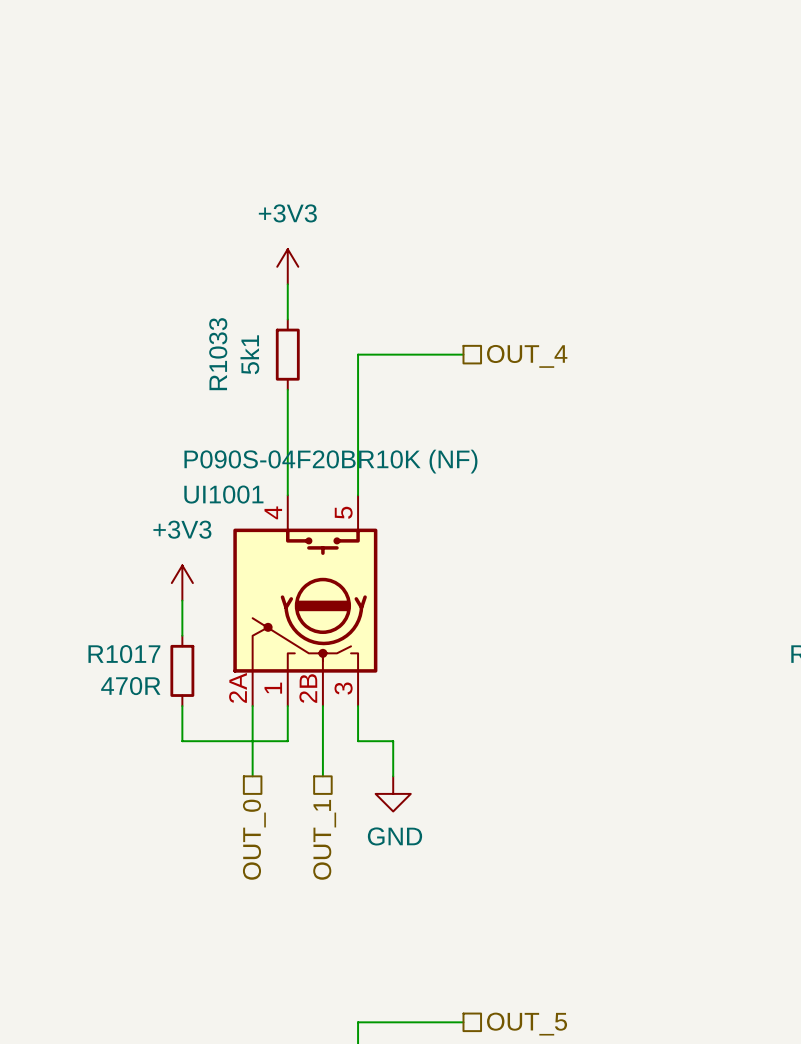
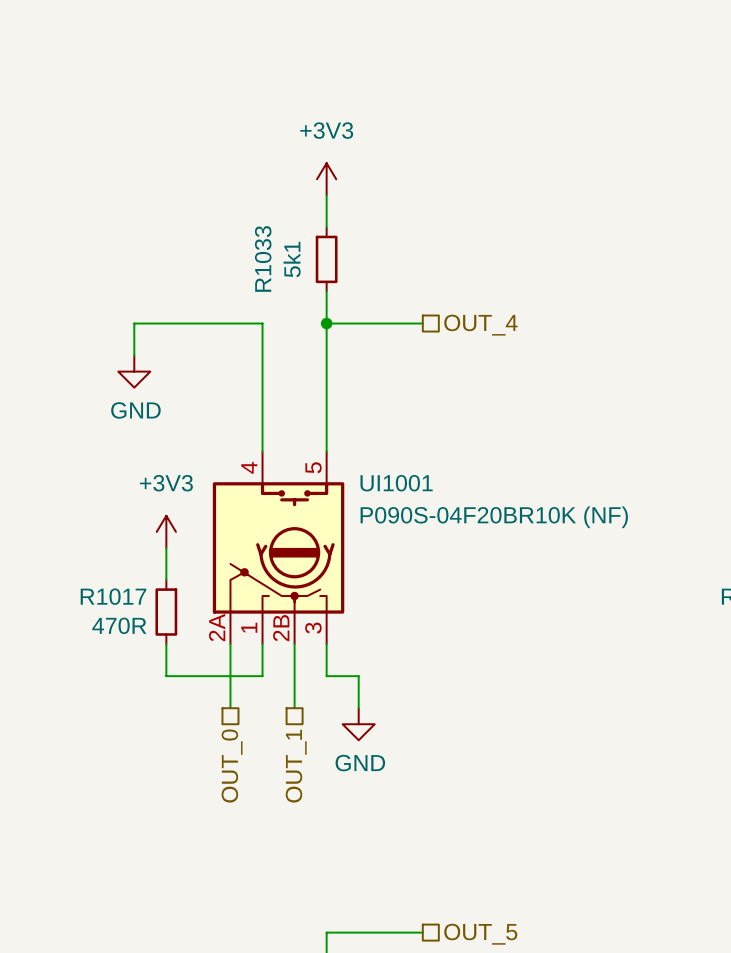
wire: none -> (326, 195) (326, 227)
power symbol position: +3V3 (287, 266) -> +3V3 (326, 179)
wire: (287, 284) (287, 319) -> (326, 291) (326, 323)
R1033 position: (287, 354) -> (326, 259)
junction: none -> (326, 323)
wire: none -> (134, 355) (134, 323) (262, 323) (262, 355)
power symbol: none -> GND (134, 371)
UI1001 value position: P090S-04F20BR10K (NF) (330, 461) -> P090S-04F20BR10K (NF) (494, 517)
UI1001 name position: UI1001 (223, 494) -> UI1001 (396, 483)

